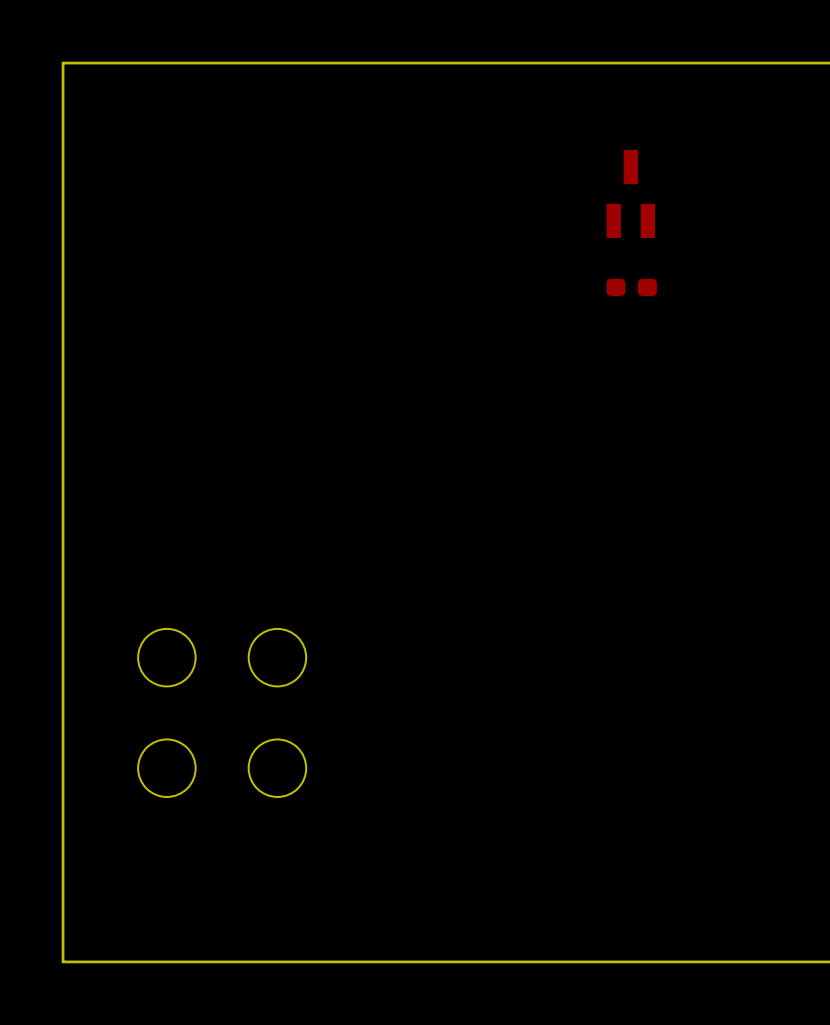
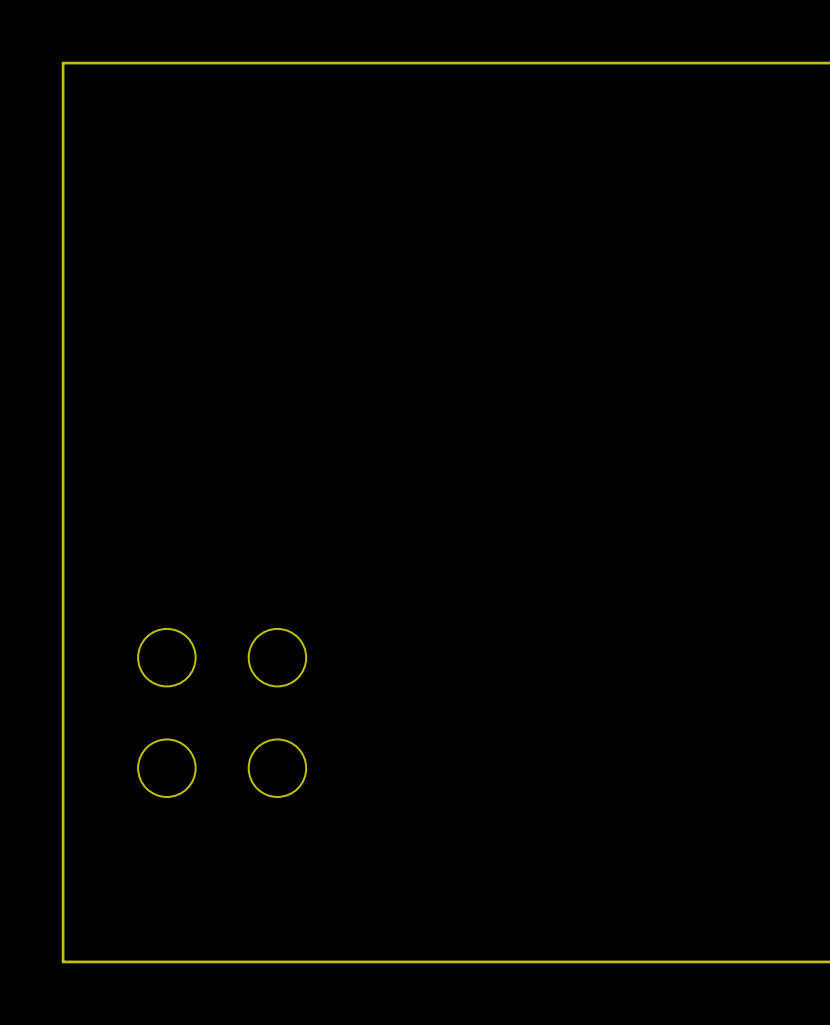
part: (630, 193) -> none
part: (631, 287) -> none

